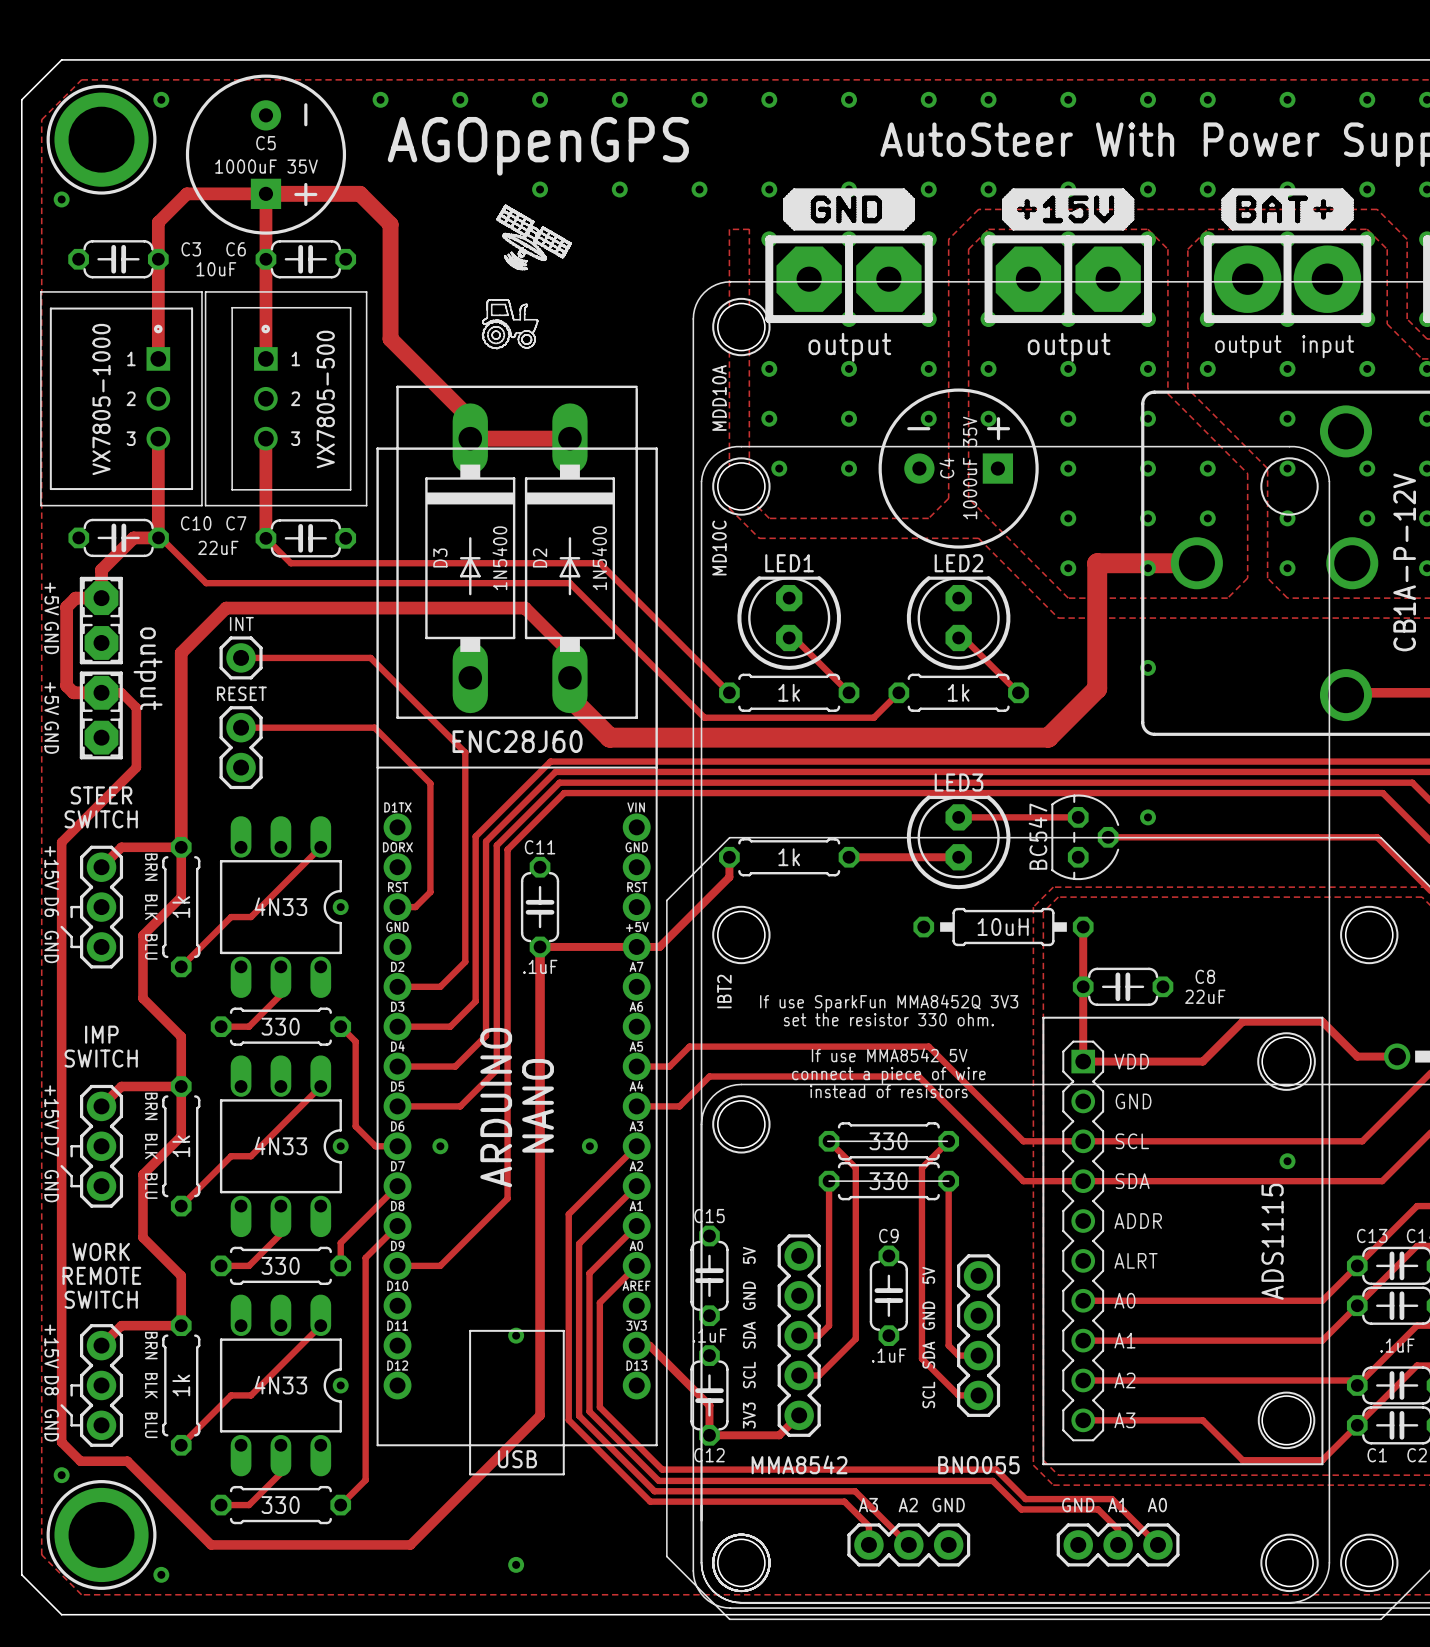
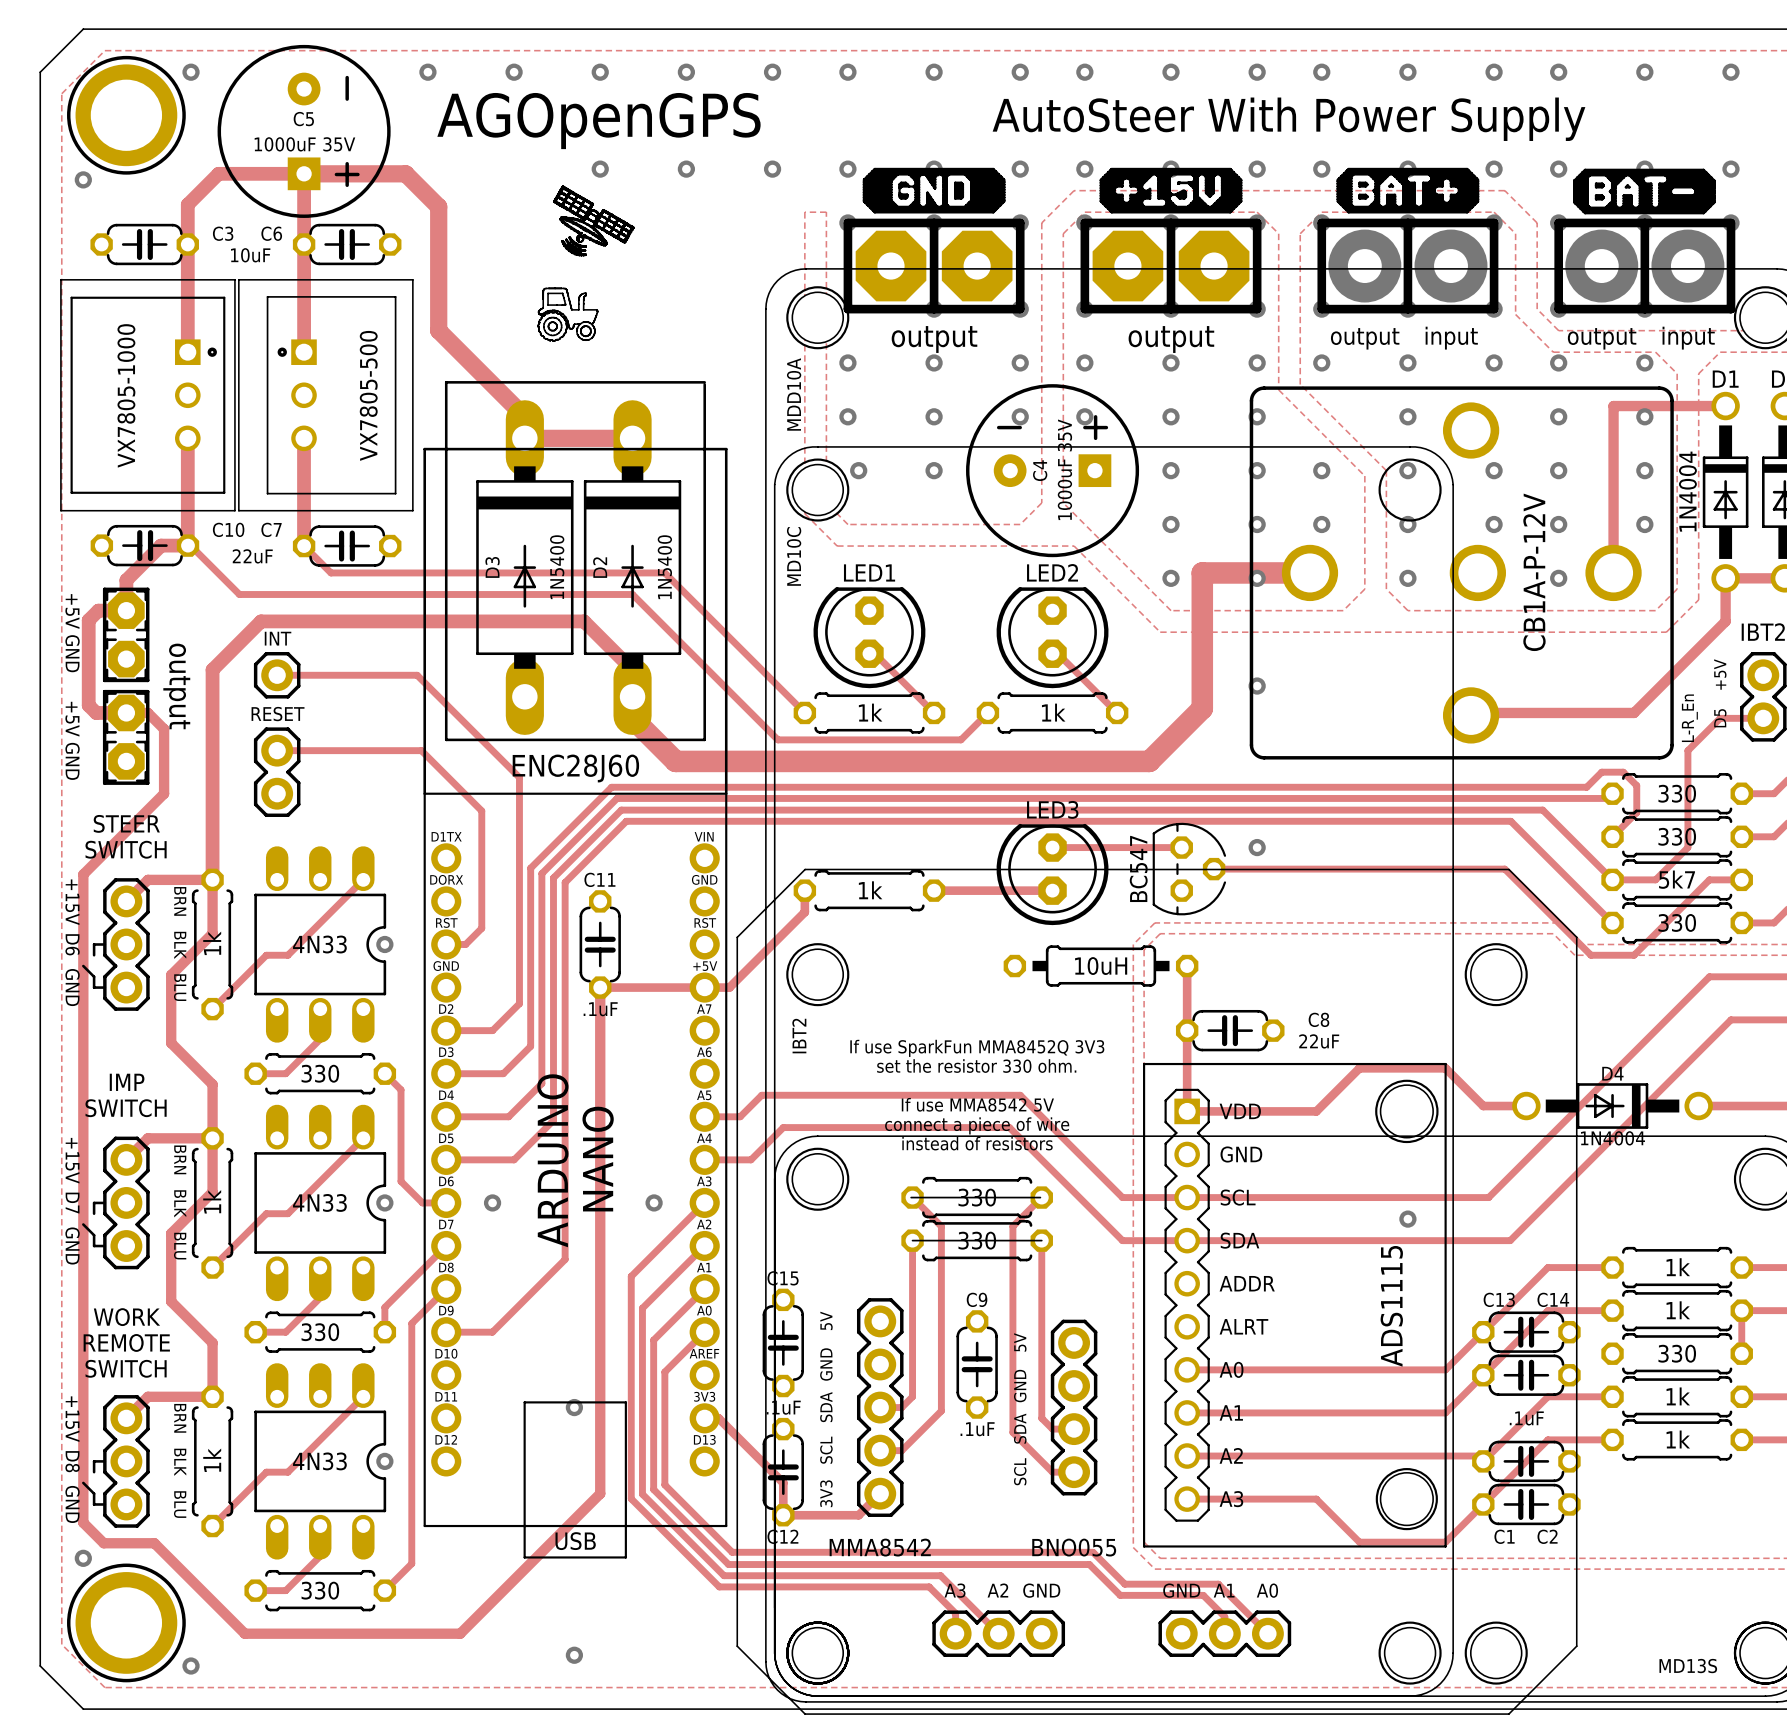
part footprint: [231, 306, 352, 491] -> [266, 296, 397, 495]
part footprint: [49, 307, 194, 491] -> [70, 296, 226, 494]

